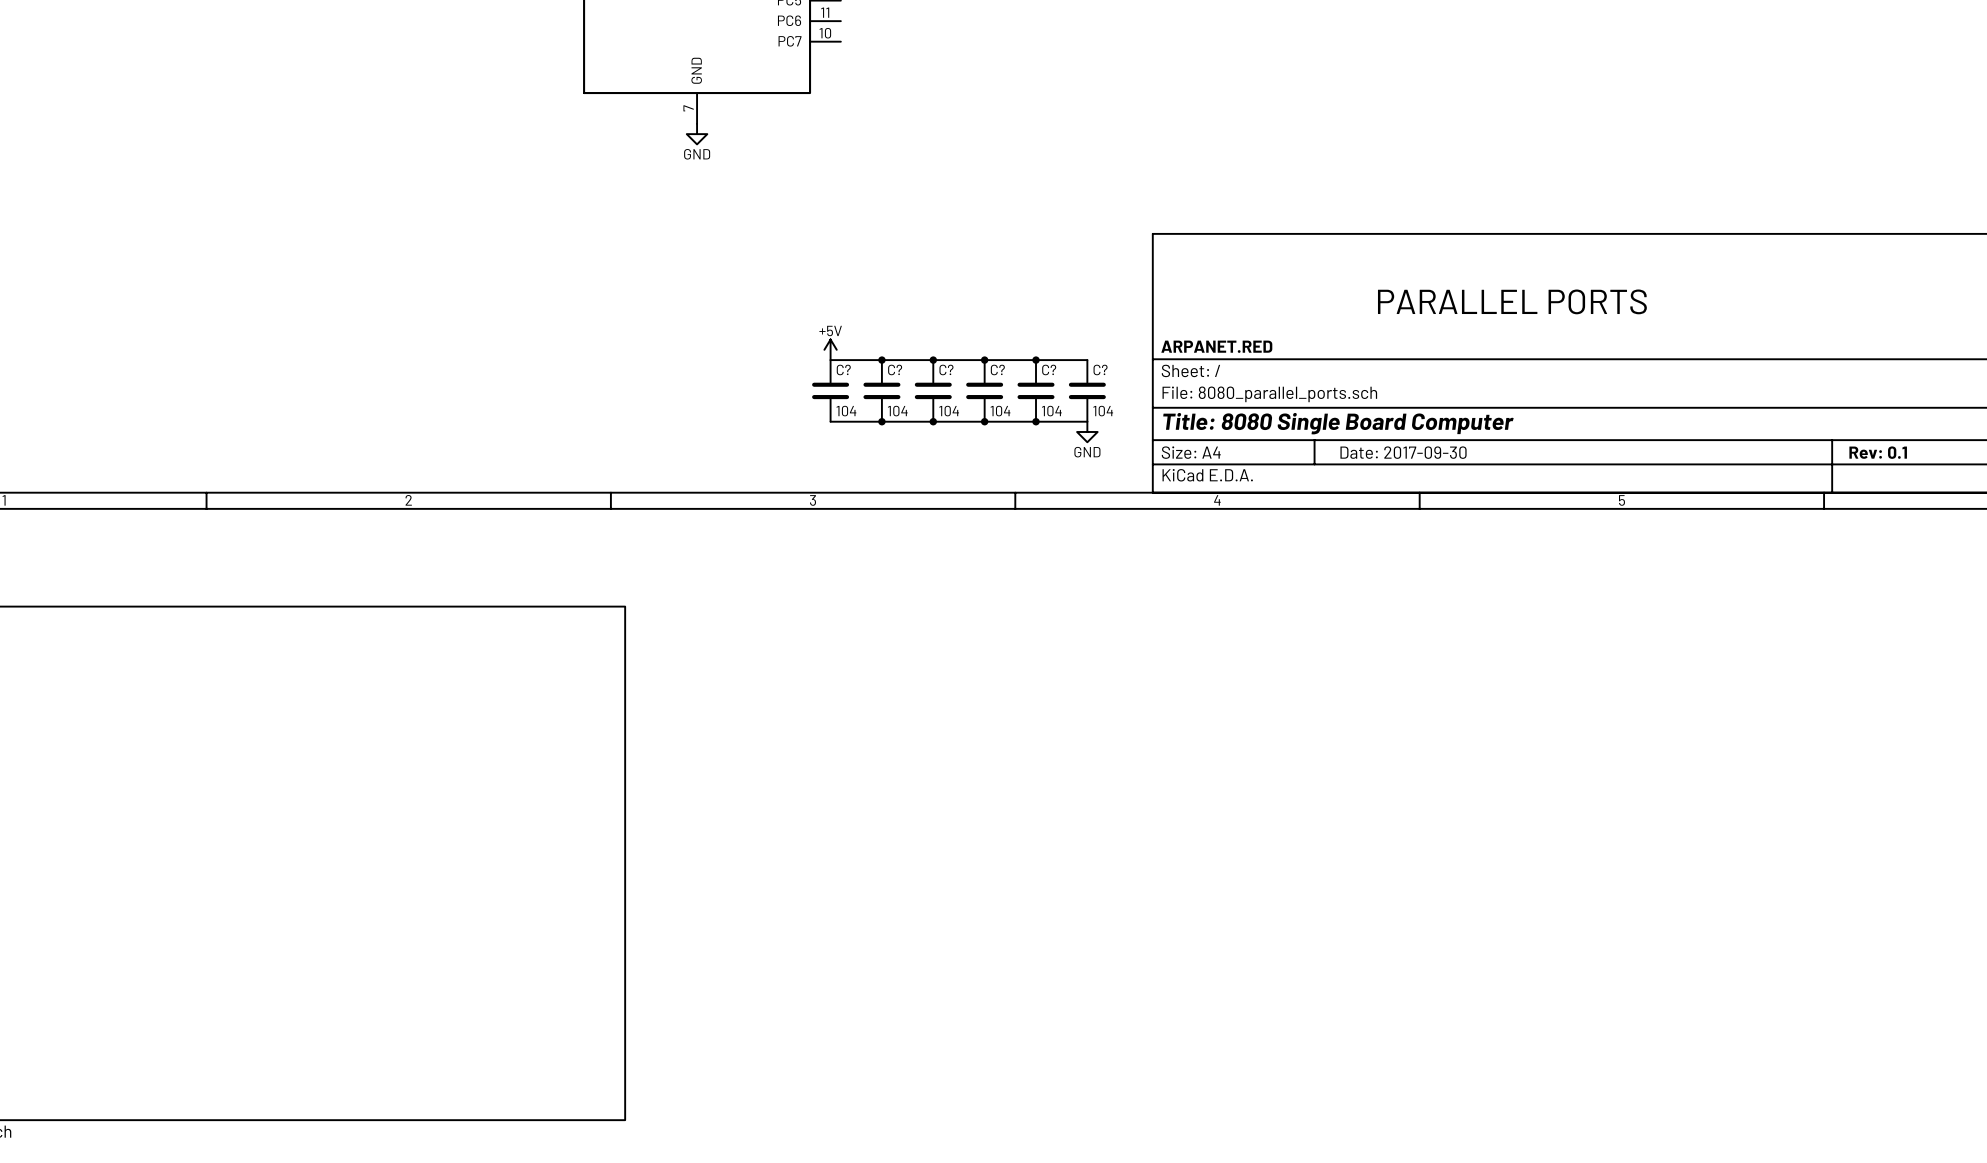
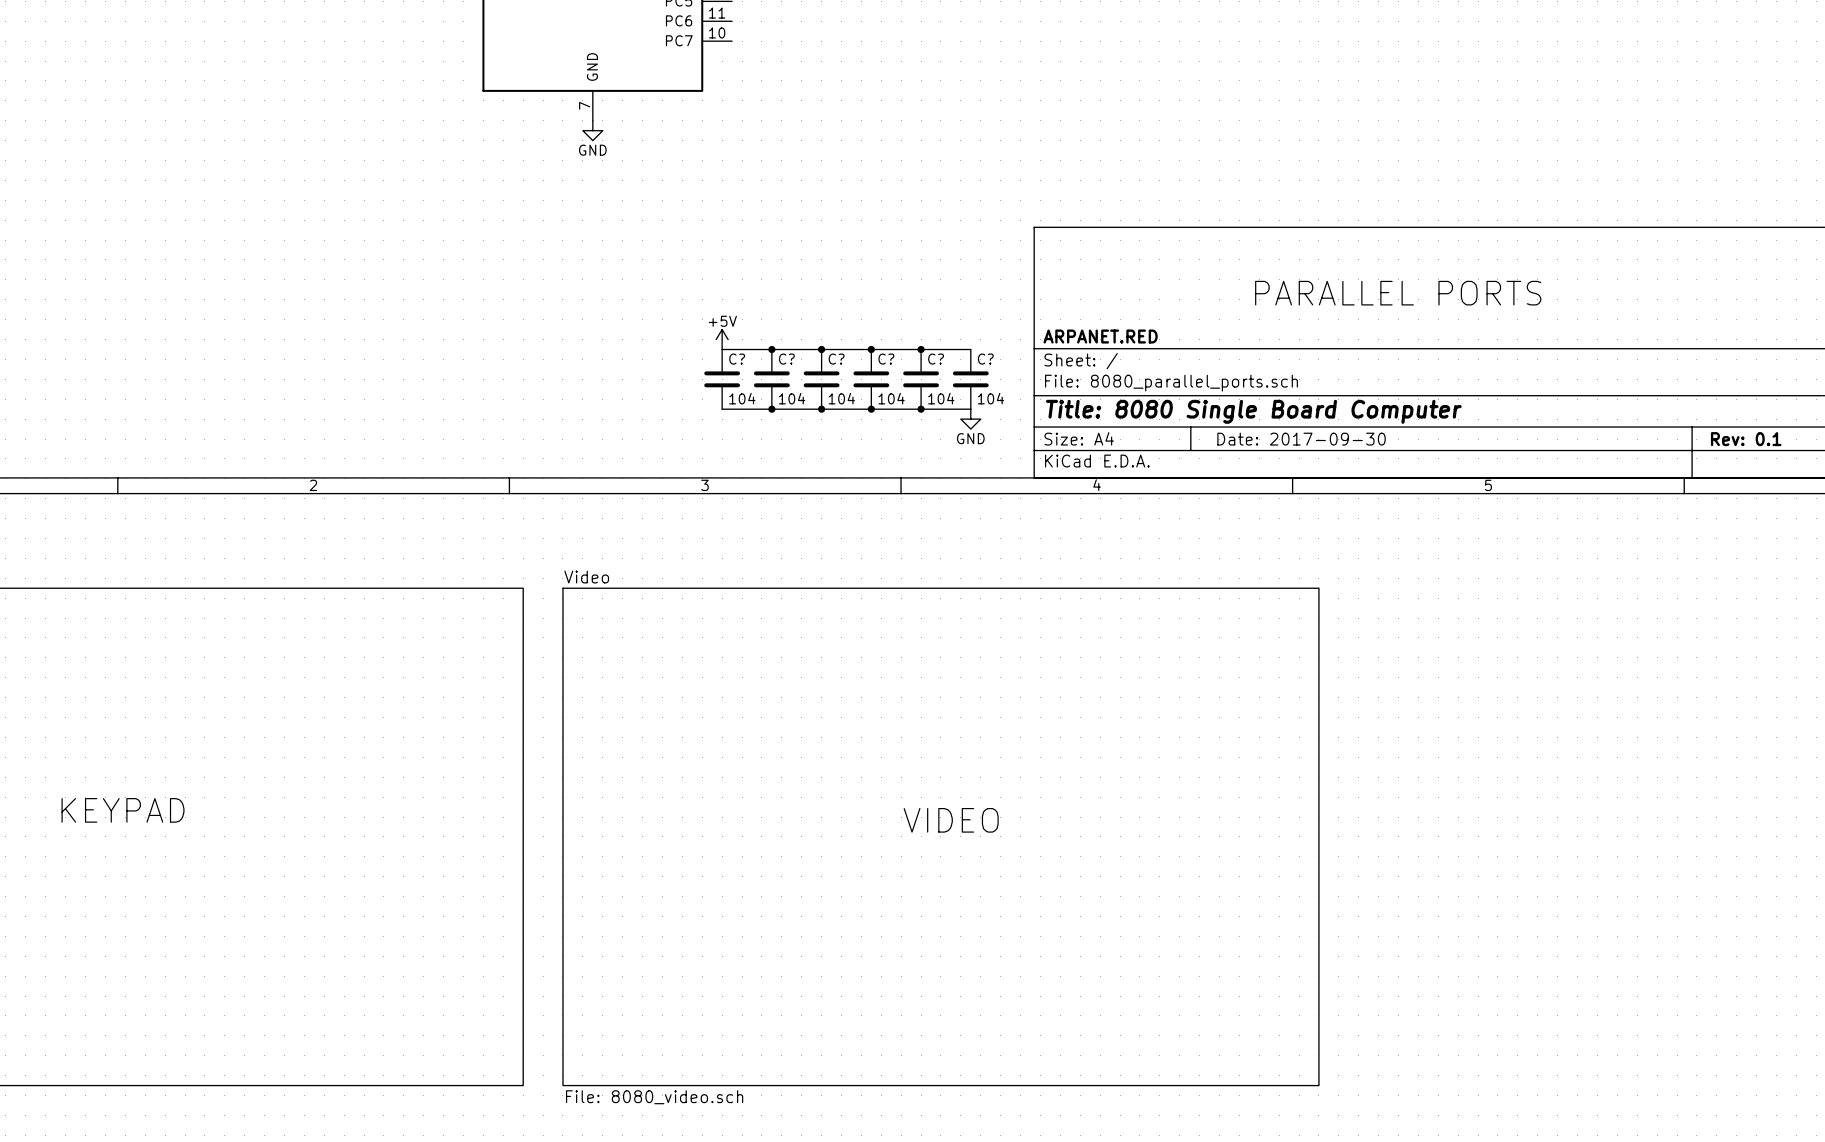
text: none -> KEYPAD (123, 810)
text: none -> VIDEO (951, 820)
sheet Video: none -> File: 8080_video.sch (940, 836)

